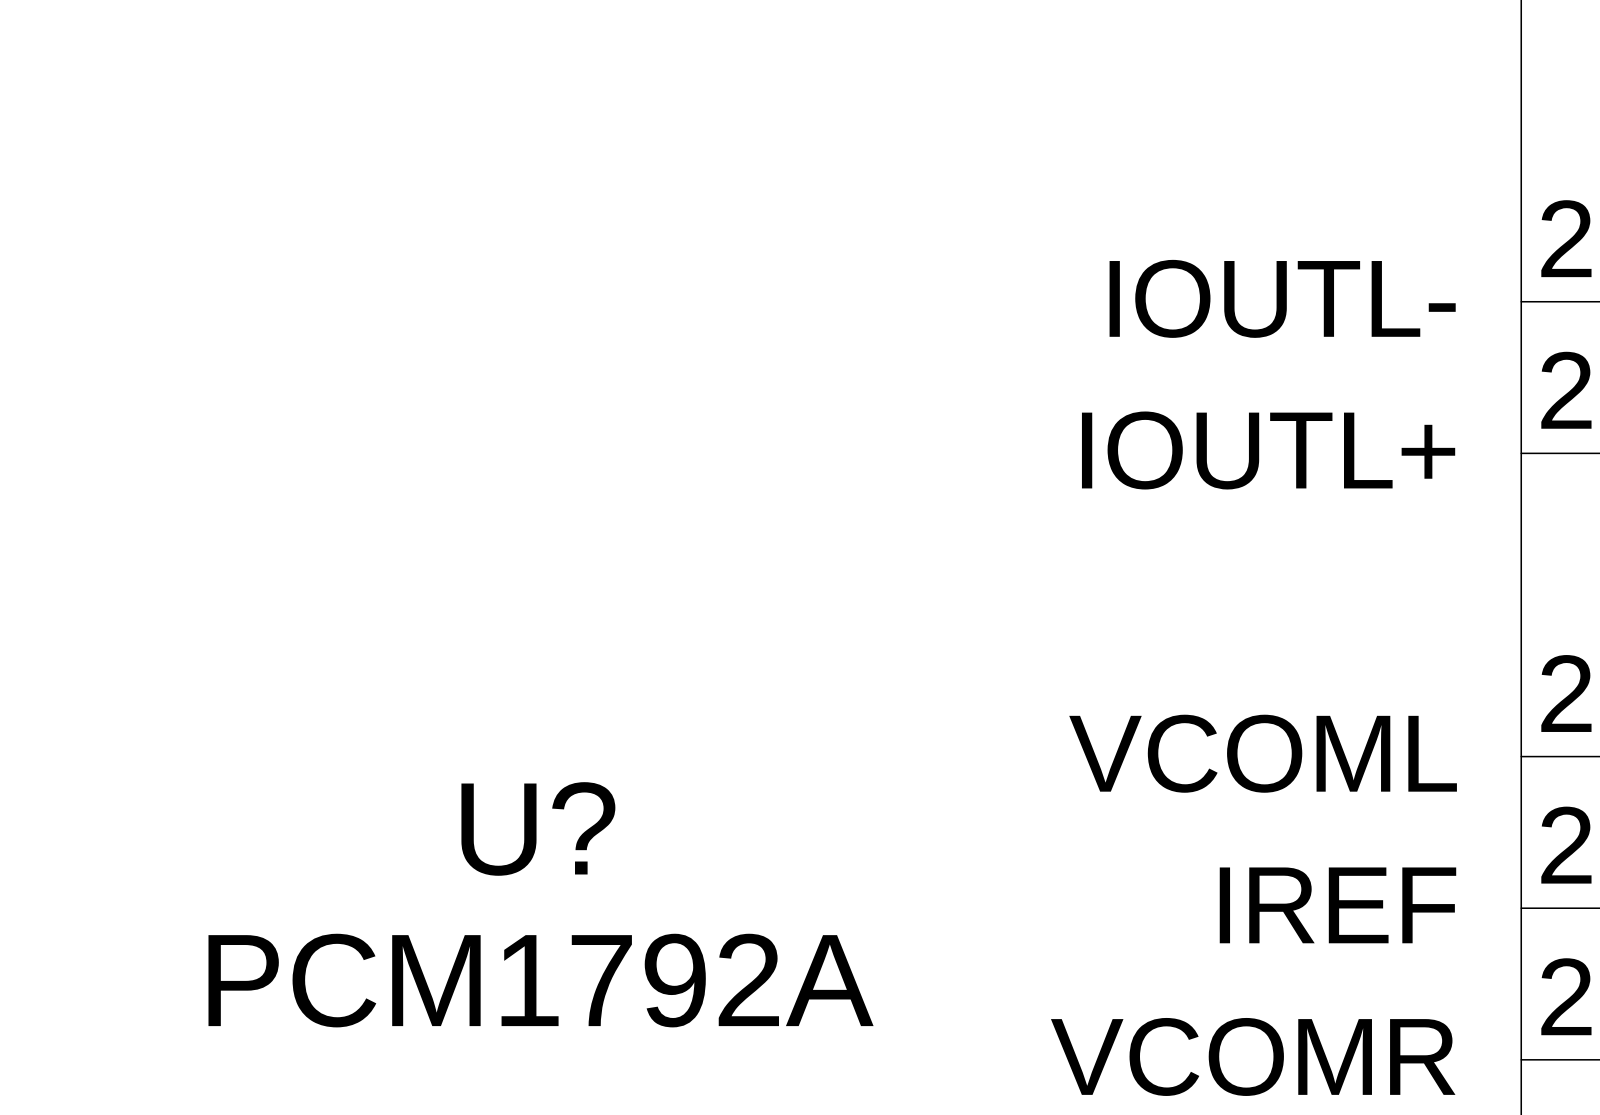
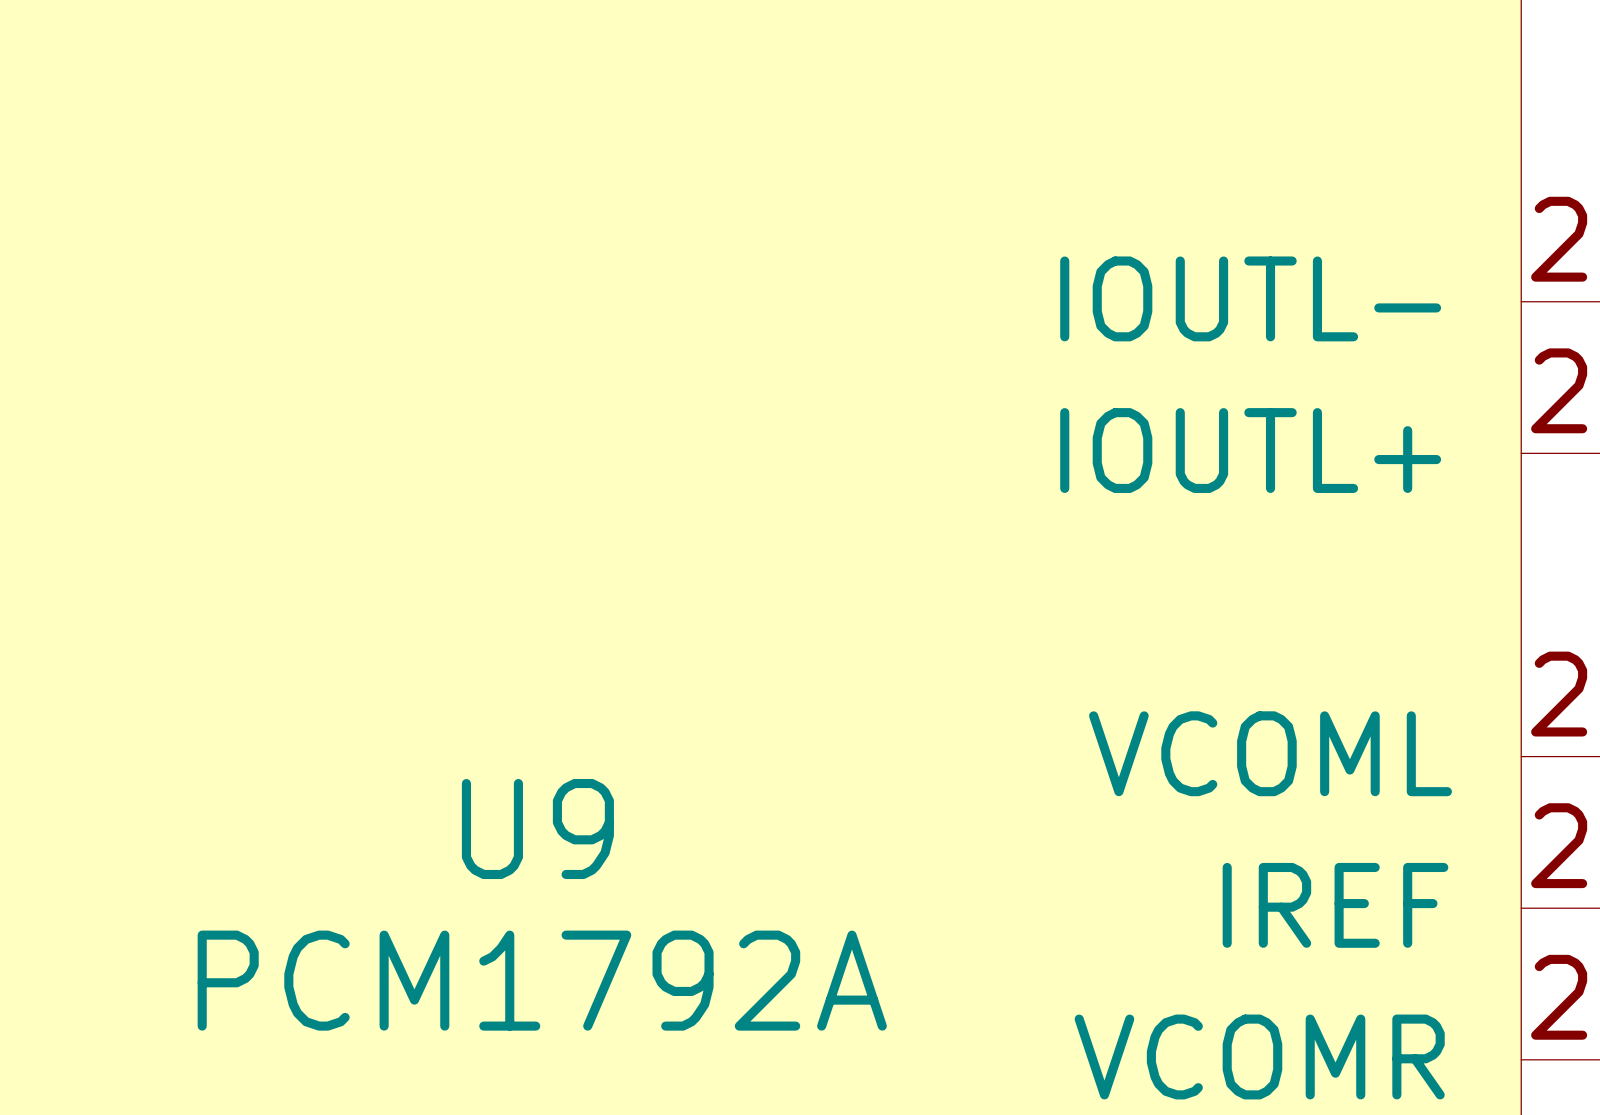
U? name: U? (538, 828) -> U9 (537, 829)

